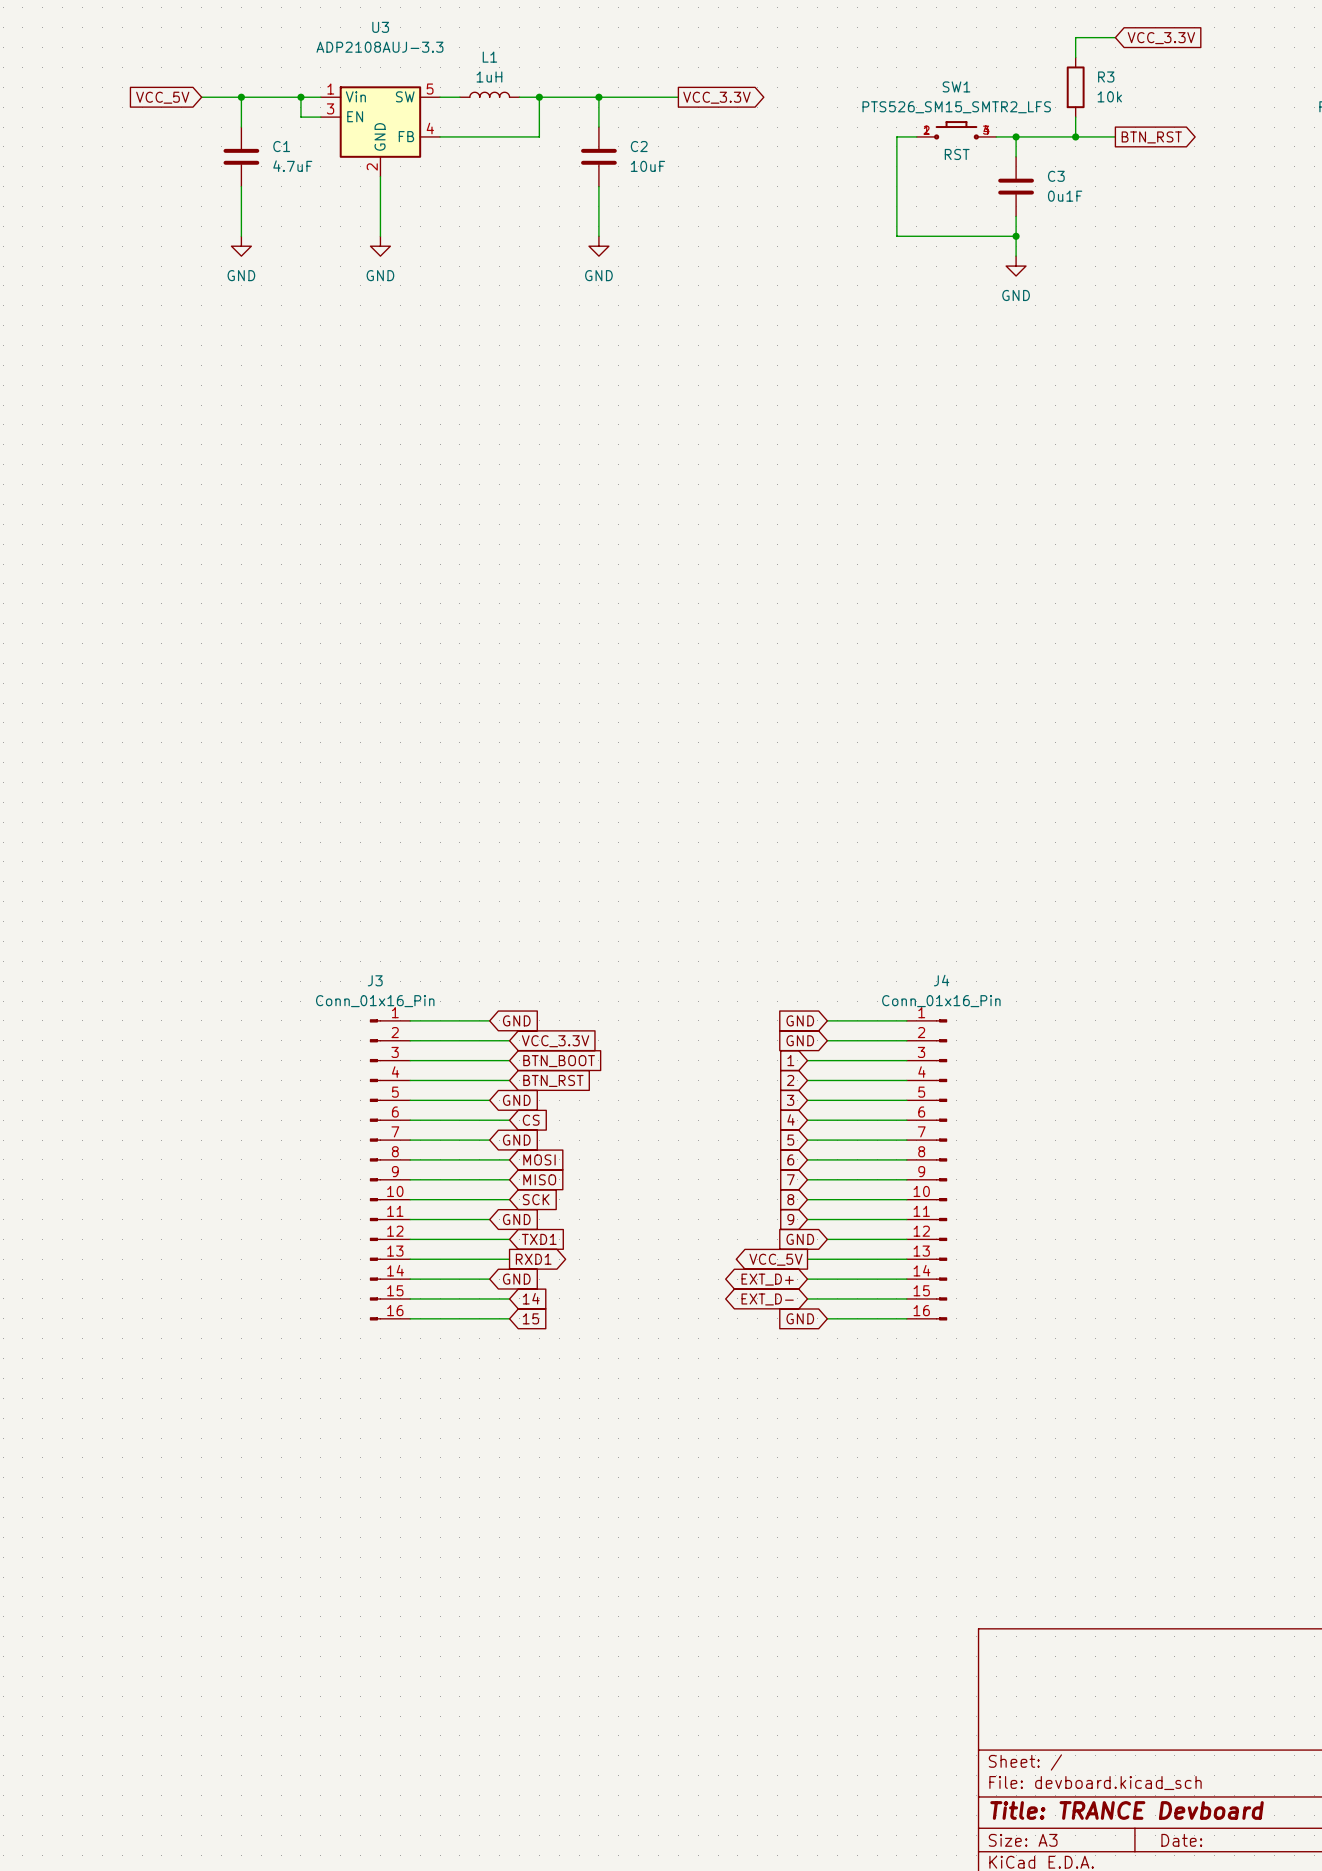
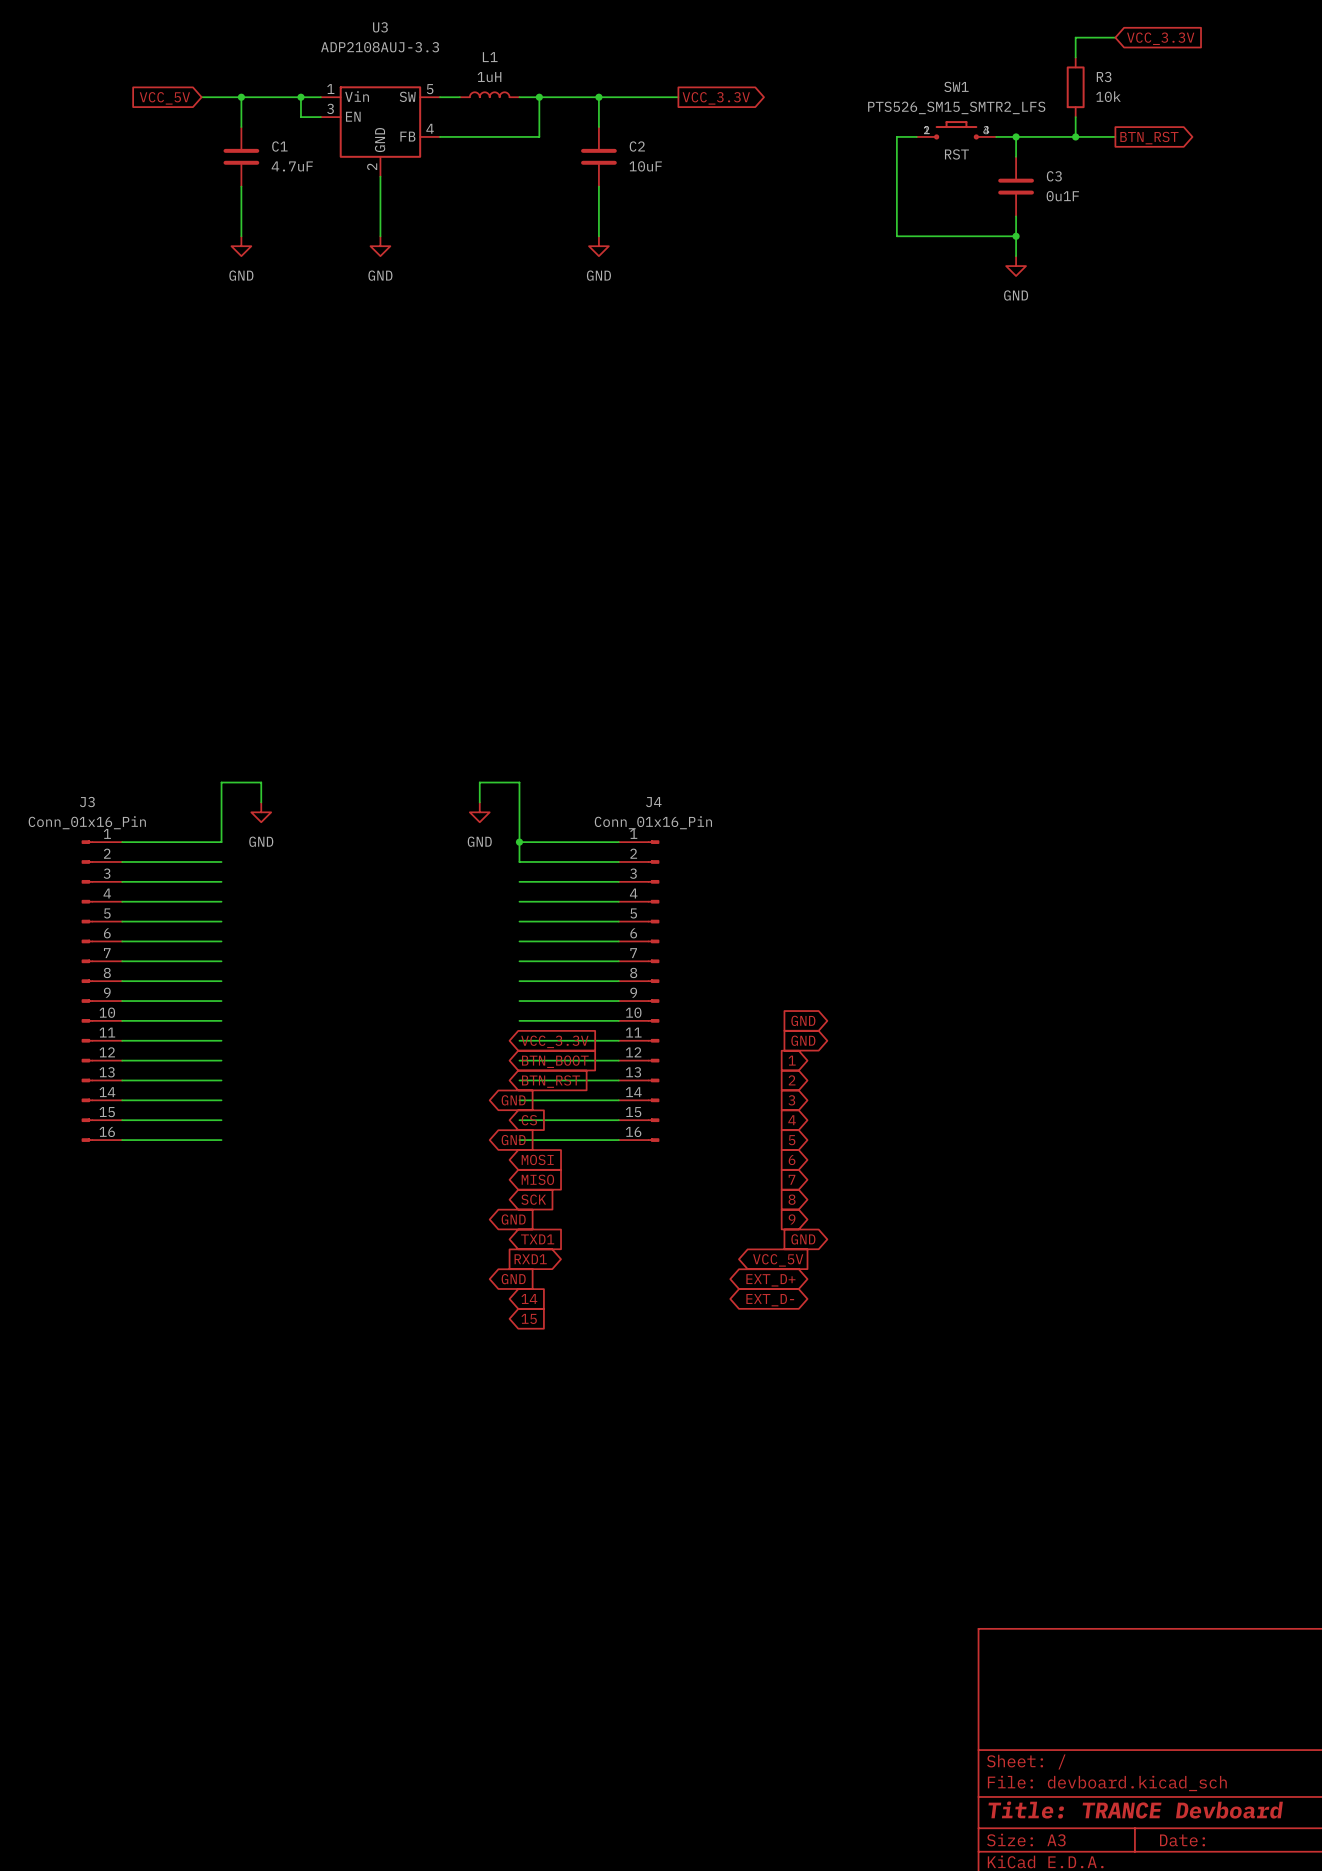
wire: none -> (261, 802) (261, 782) (221, 782) (221, 842) (122, 842)
wire: none -> (479, 802) (479, 782) (519, 782) (519, 861) (618, 861)
power symbol: none -> GND (261, 812)
power symbol: none -> GND (479, 812)
wire: none -> (519, 842) (618, 842)
junction: none -> (519, 842)
wire: none -> (122, 861) (221, 861)
wire: none -> (122, 881) (221, 881)
wire: none -> (122, 901) (221, 901)
wire: none -> (122, 921) (221, 921)
wire: none -> (122, 941) (221, 941)
wire: none -> (519, 941) (618, 941)
wire: none -> (122, 961) (221, 961)
wire: none -> (122, 981) (221, 981)
wire: none -> (519, 981) (618, 981)
wire: none -> (122, 1001) (221, 1001)
wire: none -> (122, 1020) (221, 1020)
wire: (410, 1020) (489, 1020) -> none
global label: GND (516, 1020) -> none
wire: (827, 1020) (906, 1020) -> none
wire: none -> (122, 1040) (221, 1040)
wire: (410, 1040) (509, 1040) -> (519, 881) (618, 881)
wire: (827, 1040) (906, 1040) -> none
wire: none -> (122, 1060) (221, 1060)
wire: (410, 1060) (509, 1060) -> (519, 901) (618, 901)
wire: none -> (519, 1060) (618, 1060)
wire: (807, 1060) (906, 1060) -> none
wire: none -> (122, 1080) (221, 1080)
wire: (410, 1080) (509, 1080) -> (519, 921) (618, 921)
wire: (807, 1080) (906, 1080) -> none
wire: none -> (122, 1100) (221, 1100)
wire: (410, 1100) (489, 1100) -> none
wire: (807, 1100) (906, 1100) -> none
wire: none -> (122, 1120) (221, 1120)
wire: (410, 1120) (509, 1120) -> (519, 961) (618, 961)
wire: none -> (519, 1120) (618, 1120)
wire: (807, 1120) (906, 1120) -> none
wire: none -> (122, 1140) (221, 1140)
wire: (410, 1140) (489, 1140) -> none
wire: (807, 1140) (906, 1140) -> none
wire: (410, 1159) (509, 1159) -> (519, 1001) (618, 1001)
wire: (807, 1159) (906, 1159) -> none
J3 position: (390, 1169) -> (102, 991)
J4 position: (926, 1169) -> (638, 991)
wire: (410, 1179) (509, 1179) -> (519, 1020) (618, 1020)
wire: (807, 1179) (906, 1179) -> none
wire: (410, 1199) (509, 1199) -> (519, 1040) (618, 1040)
wire: (807, 1199) (906, 1199) -> none
wire: (410, 1219) (489, 1219) -> none
wire: (807, 1219) (906, 1219) -> none
wire: (410, 1239) (509, 1239) -> (519, 1080) (618, 1080)
wire: (827, 1239) (906, 1239) -> none
wire: (410, 1259) (509, 1259) -> (519, 1100) (618, 1100)
wire: (807, 1259) (906, 1259) -> none
wire: (410, 1279) (489, 1279) -> none
wire: (807, 1279) (906, 1279) -> none
wire: (410, 1298) (509, 1298) -> (519, 1140) (618, 1140)
wire: (807, 1298) (906, 1298) -> none
wire: (410, 1318) (509, 1318) -> none
global label: GND (800, 1318) -> none
wire: (827, 1318) (906, 1318) -> none

